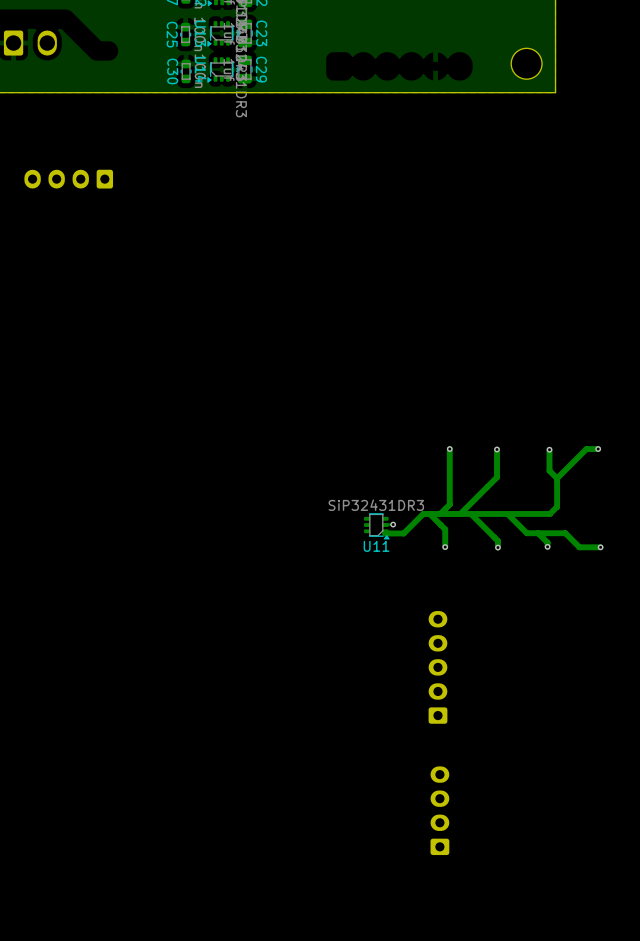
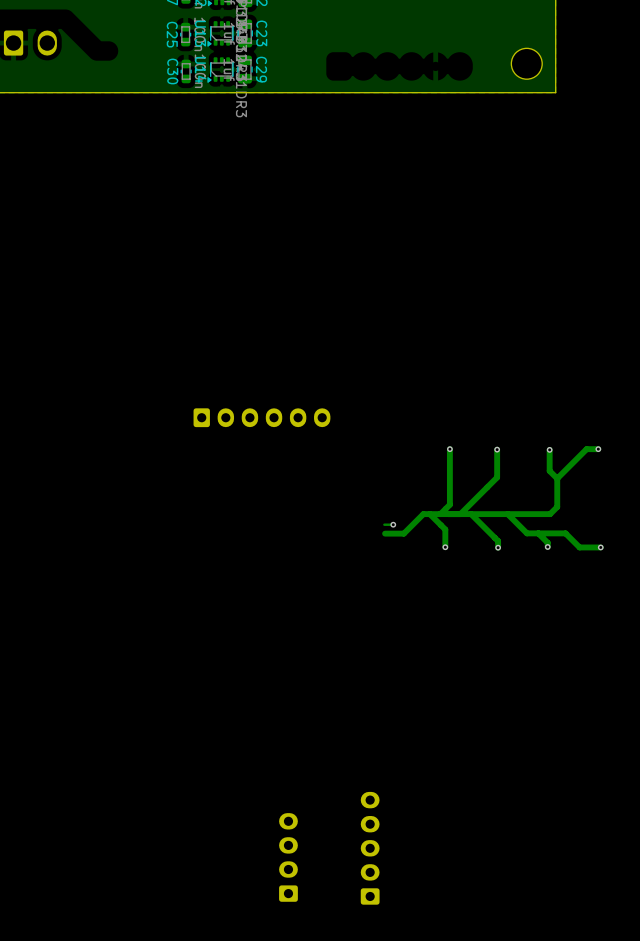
part: (68, 179) -> none
part: none -> (261, 417)
U11: SiP32431DR3 (376, 526) -> none
part position: (437, 667) -> (370, 848)
part position: (439, 810) -> (288, 857)

